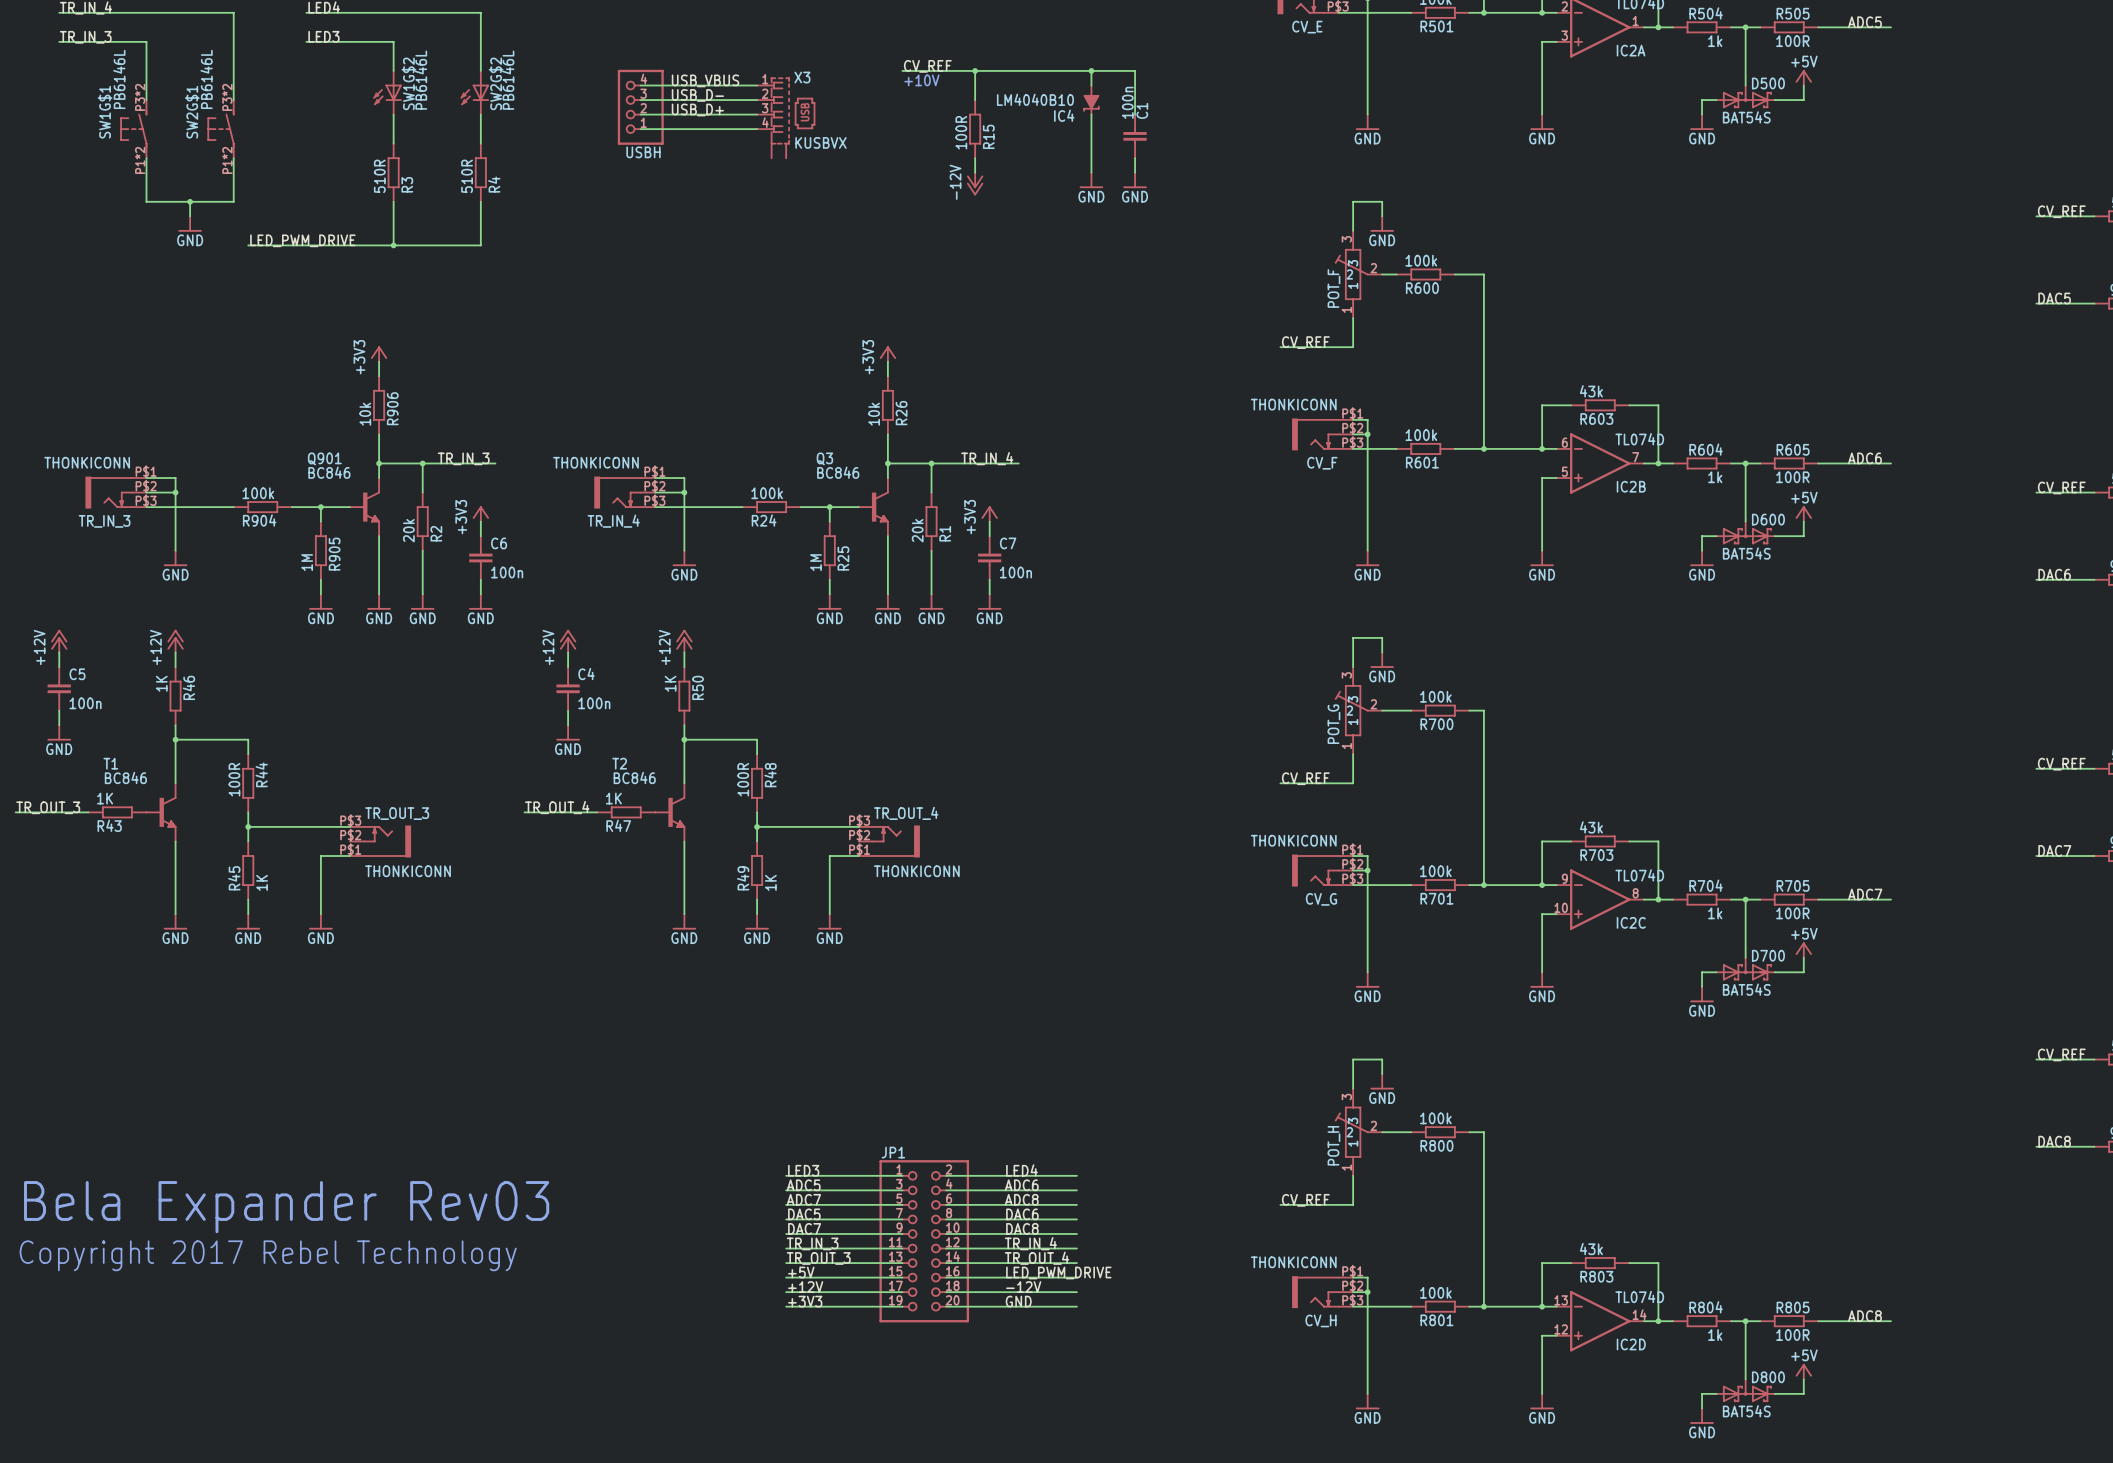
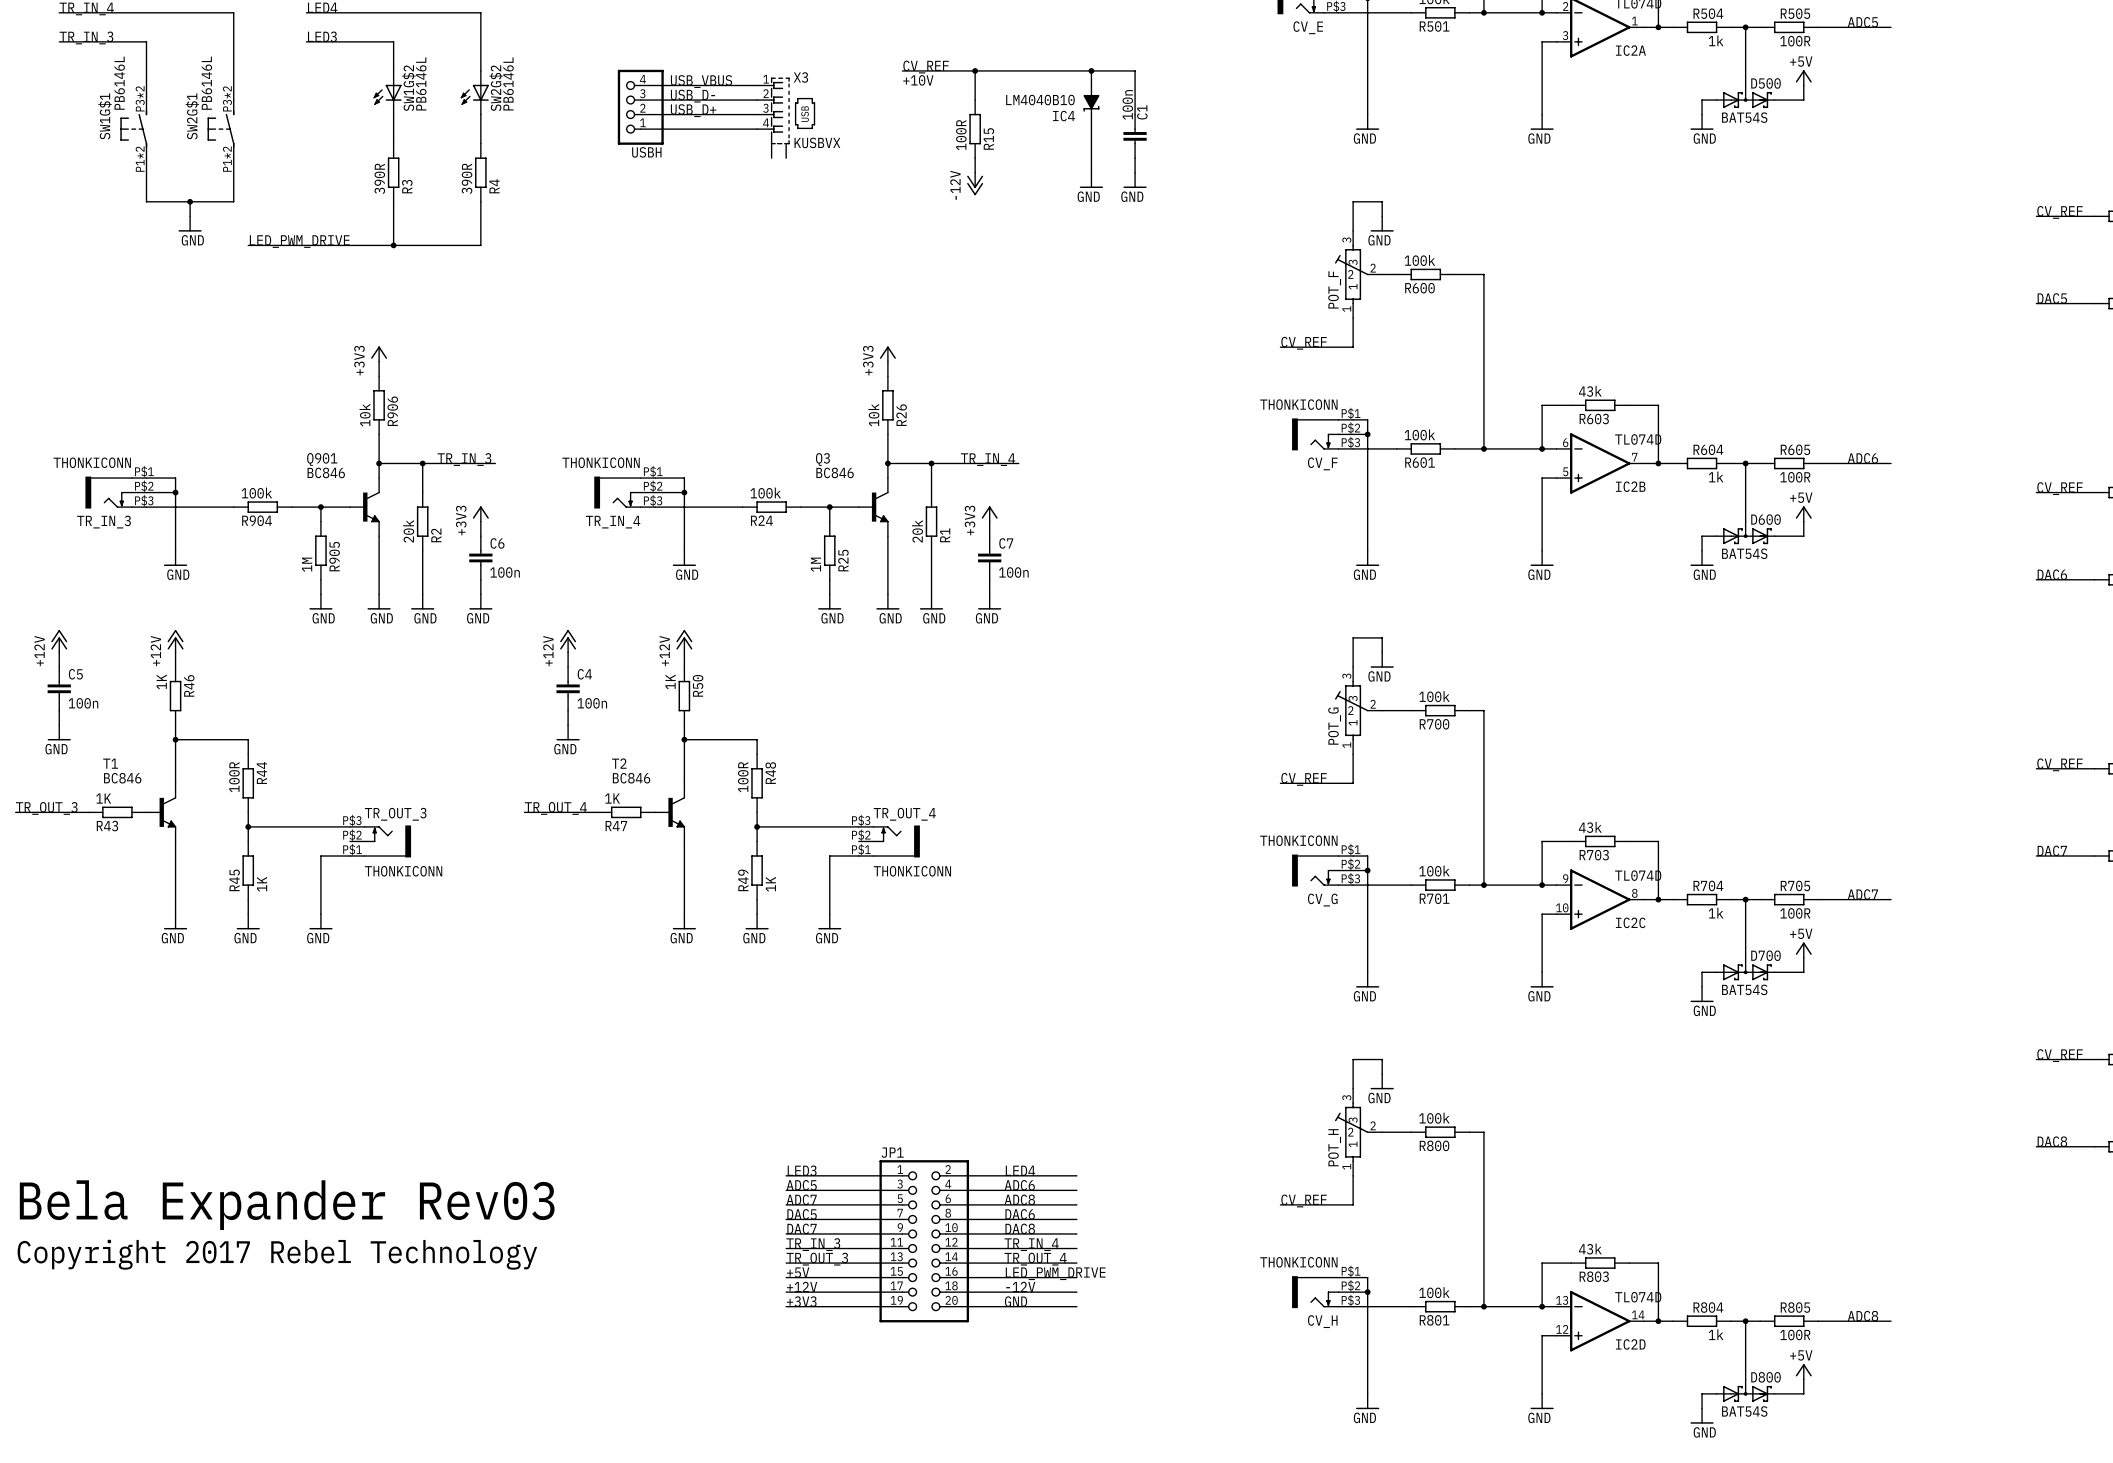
R3 value: 510R (379, 176) -> 390R (379, 178)
R4 value: 510R (467, 176) -> 390R (467, 178)

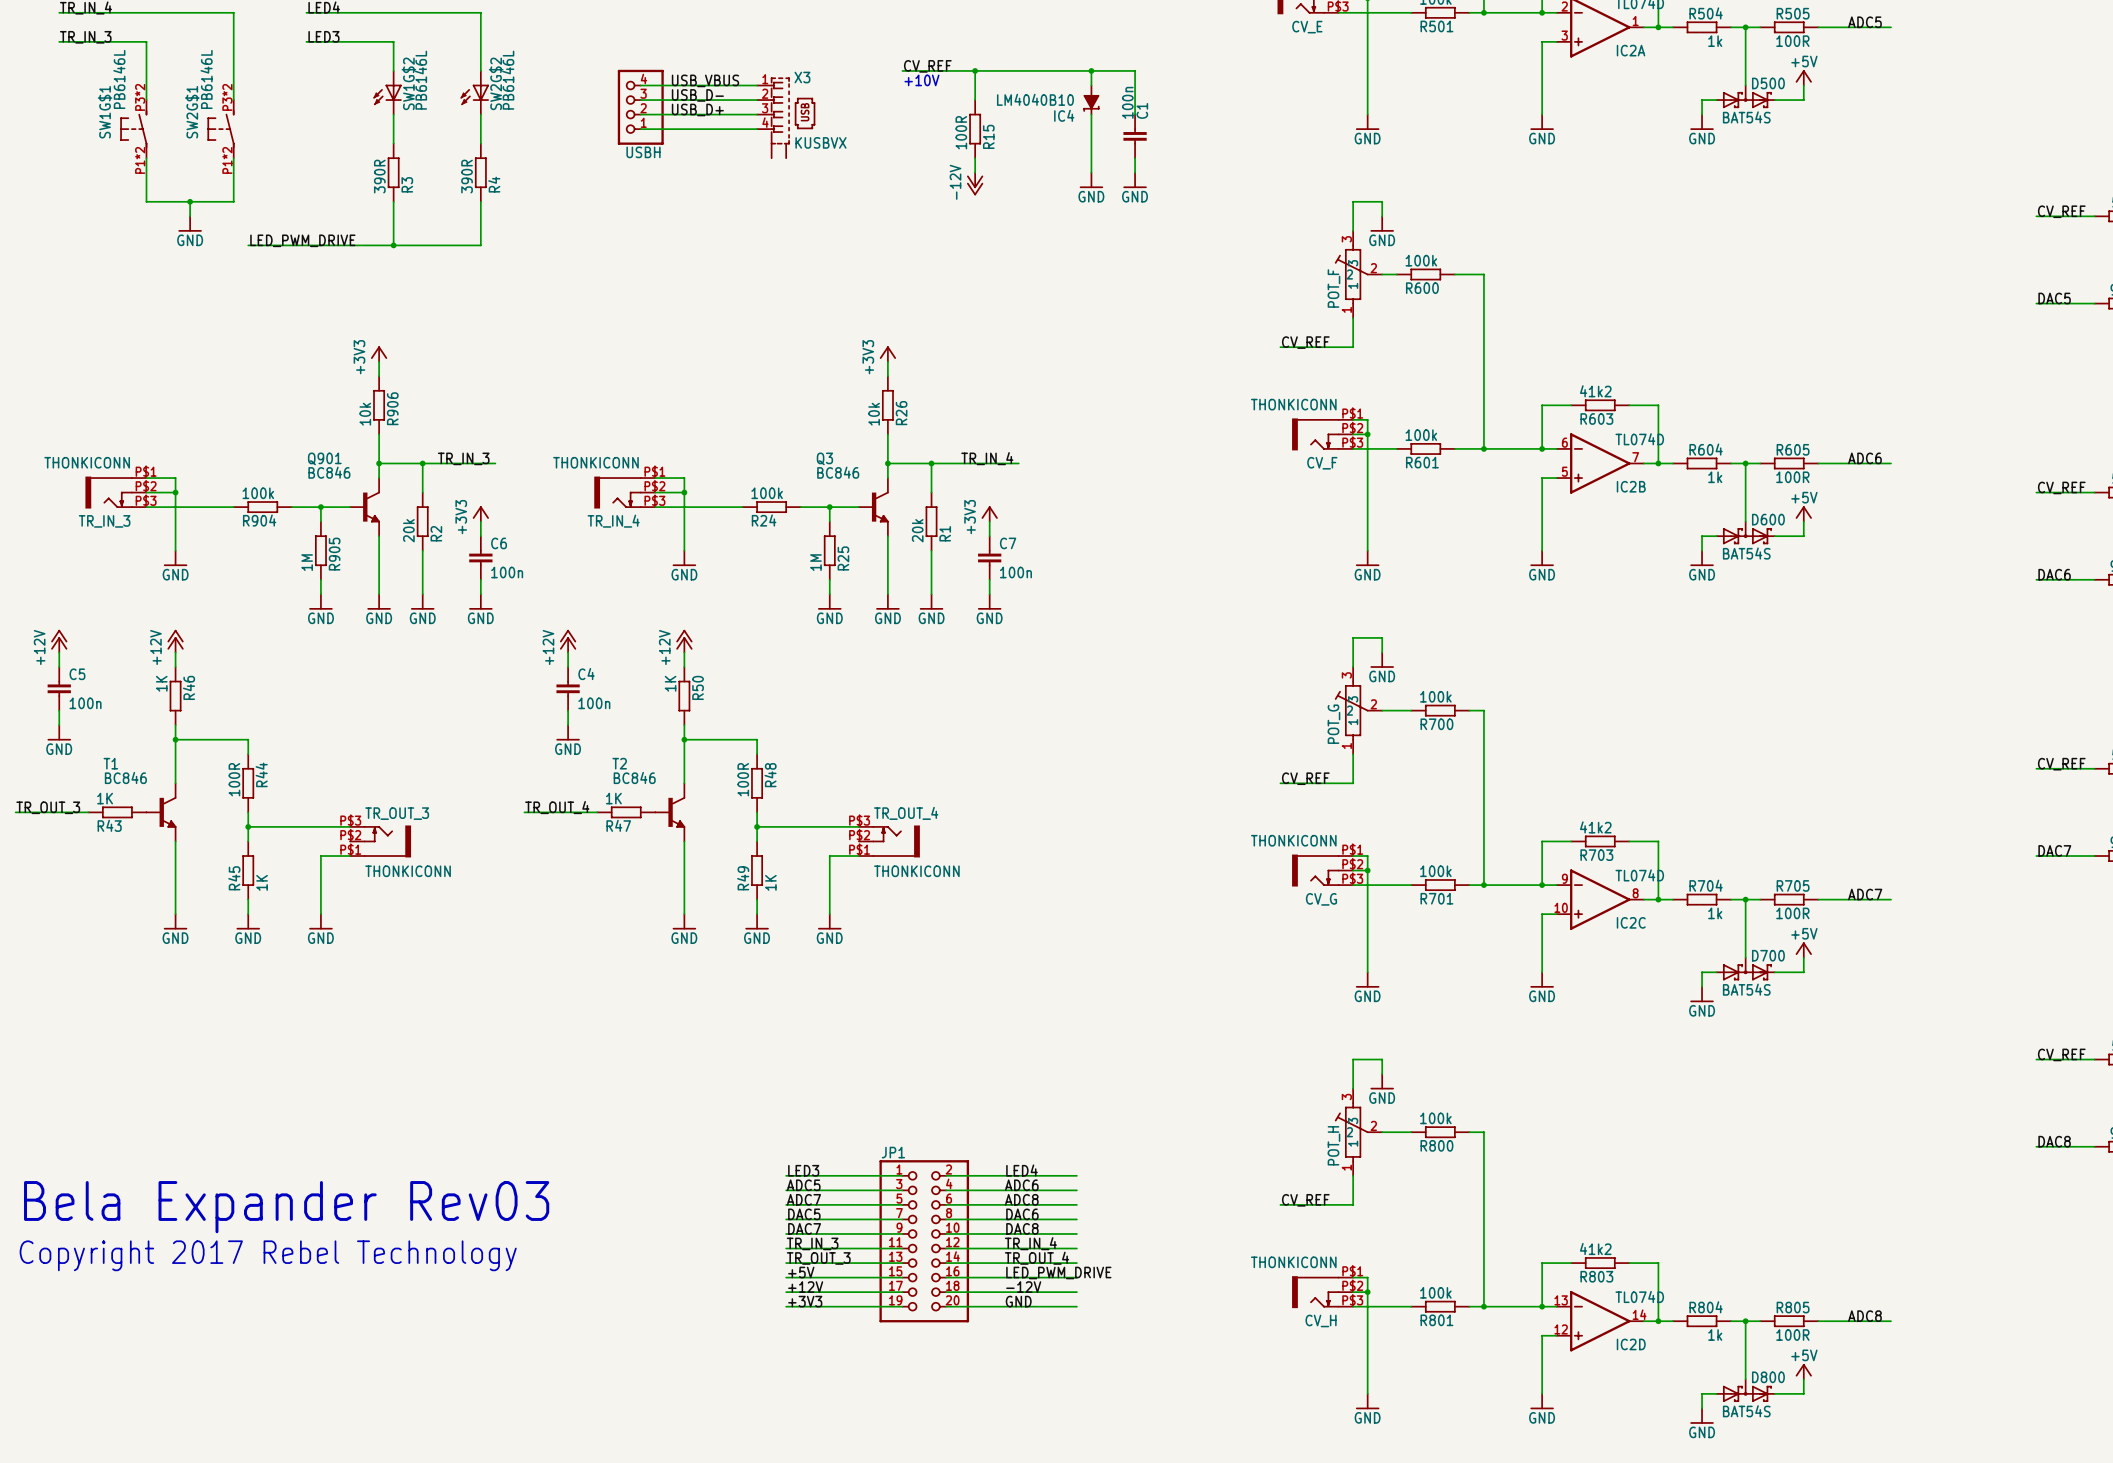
R603 value: 43k (1590, 391) -> 41k2 (1595, 391)
R703 value: 43k (1590, 827) -> 41k2 (1595, 827)
R803 value: 43k (1590, 1249) -> 41k2 (1595, 1249)

